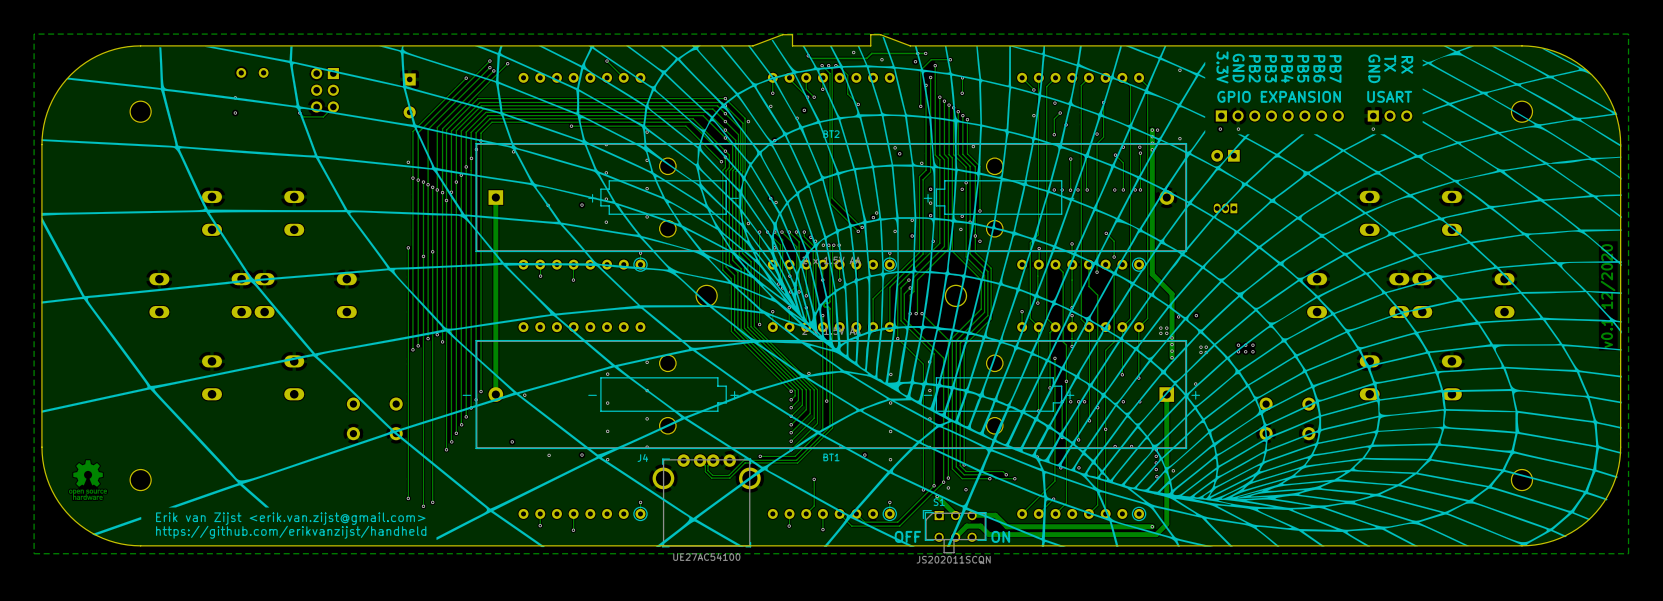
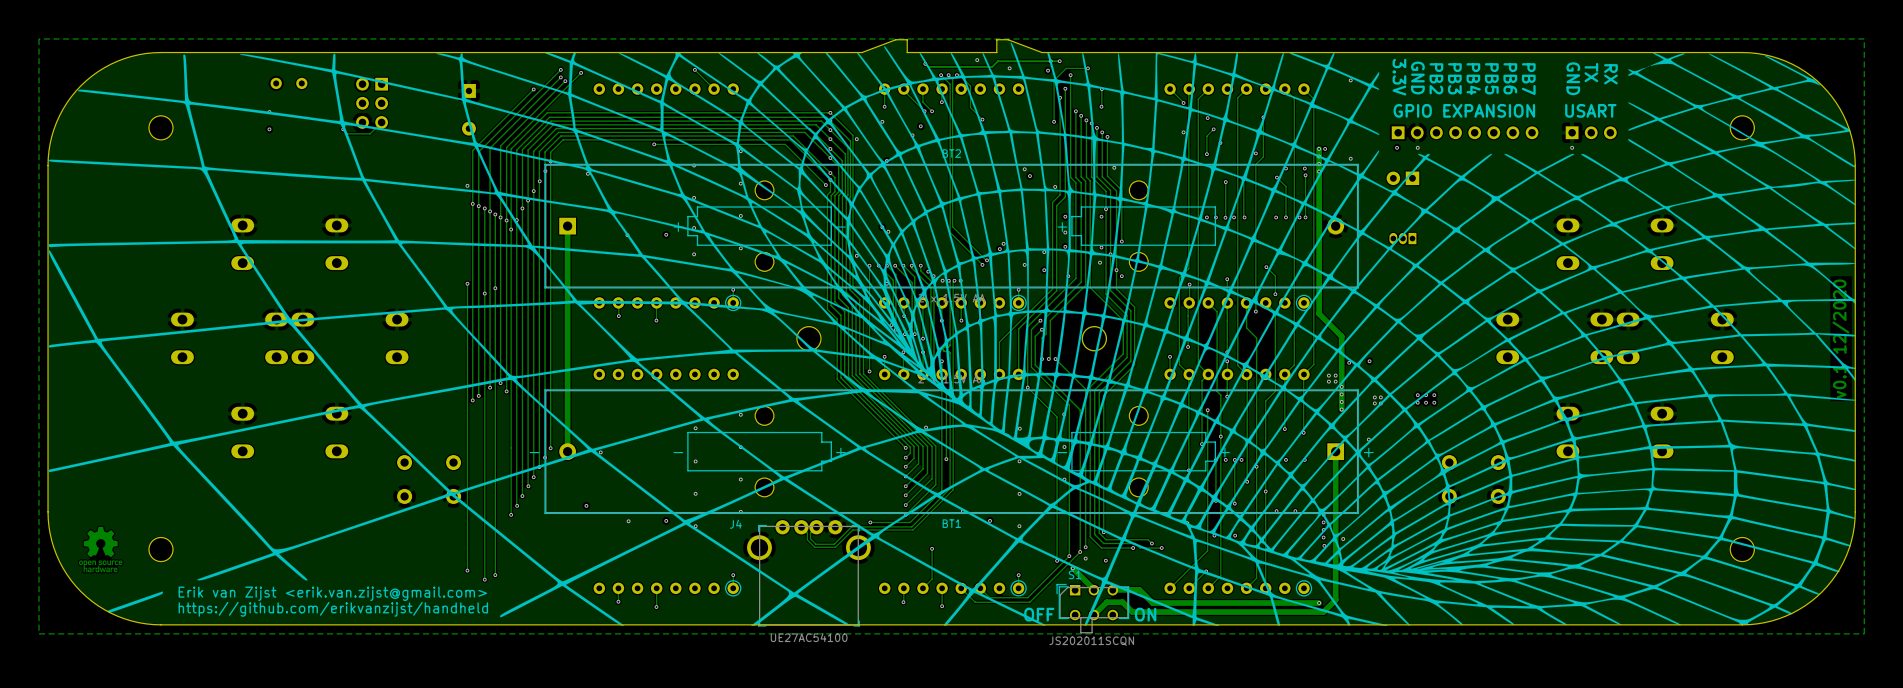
drawing shape: [41, 36, 1622, 548] -> [48, 42, 1856, 626]

